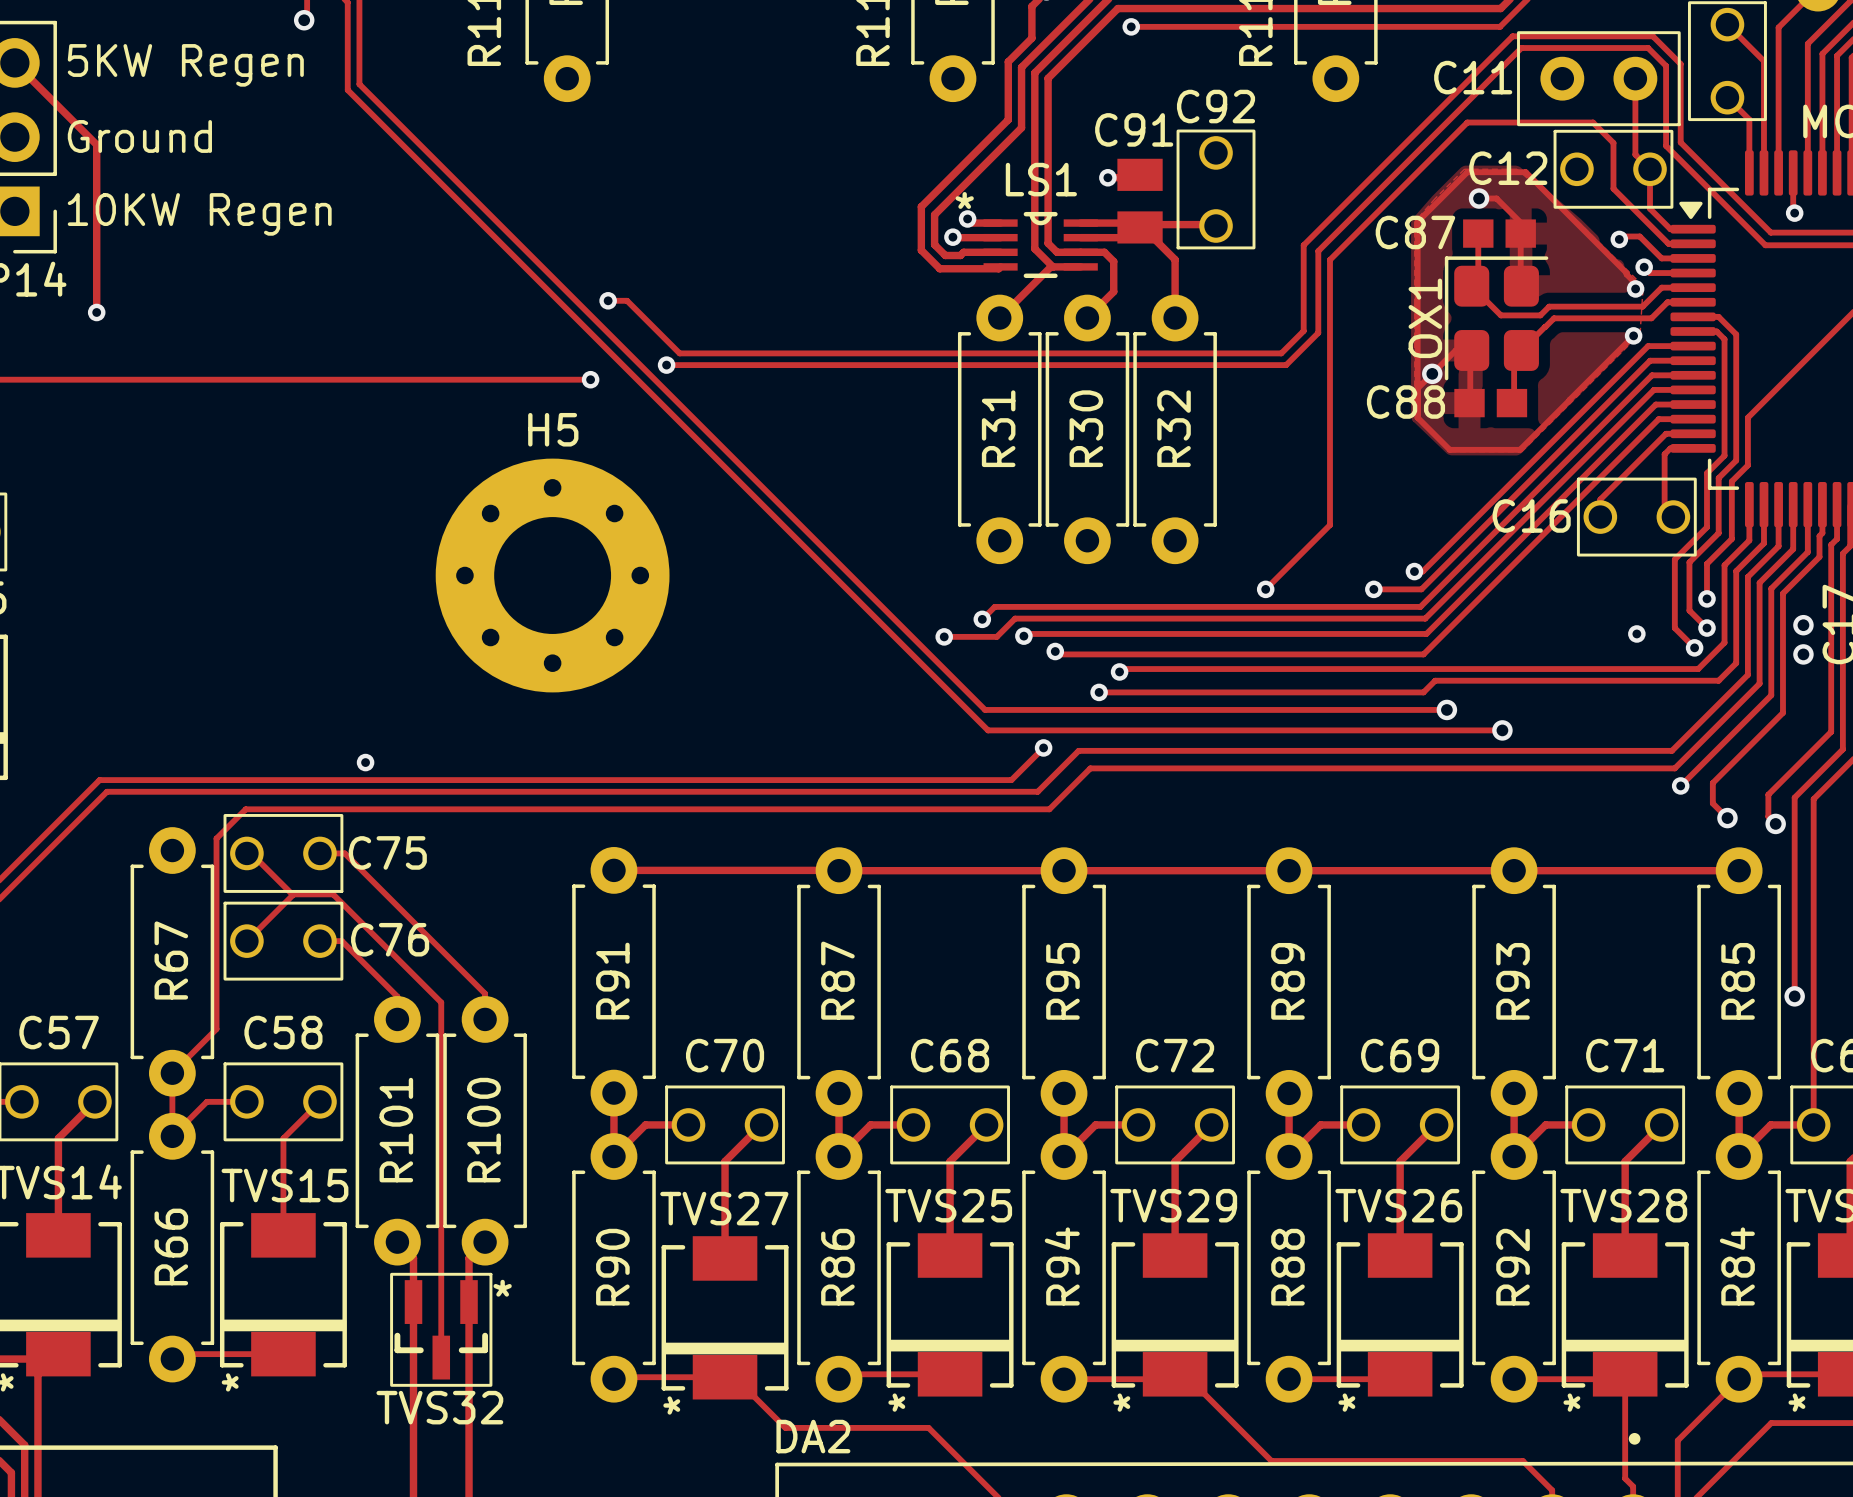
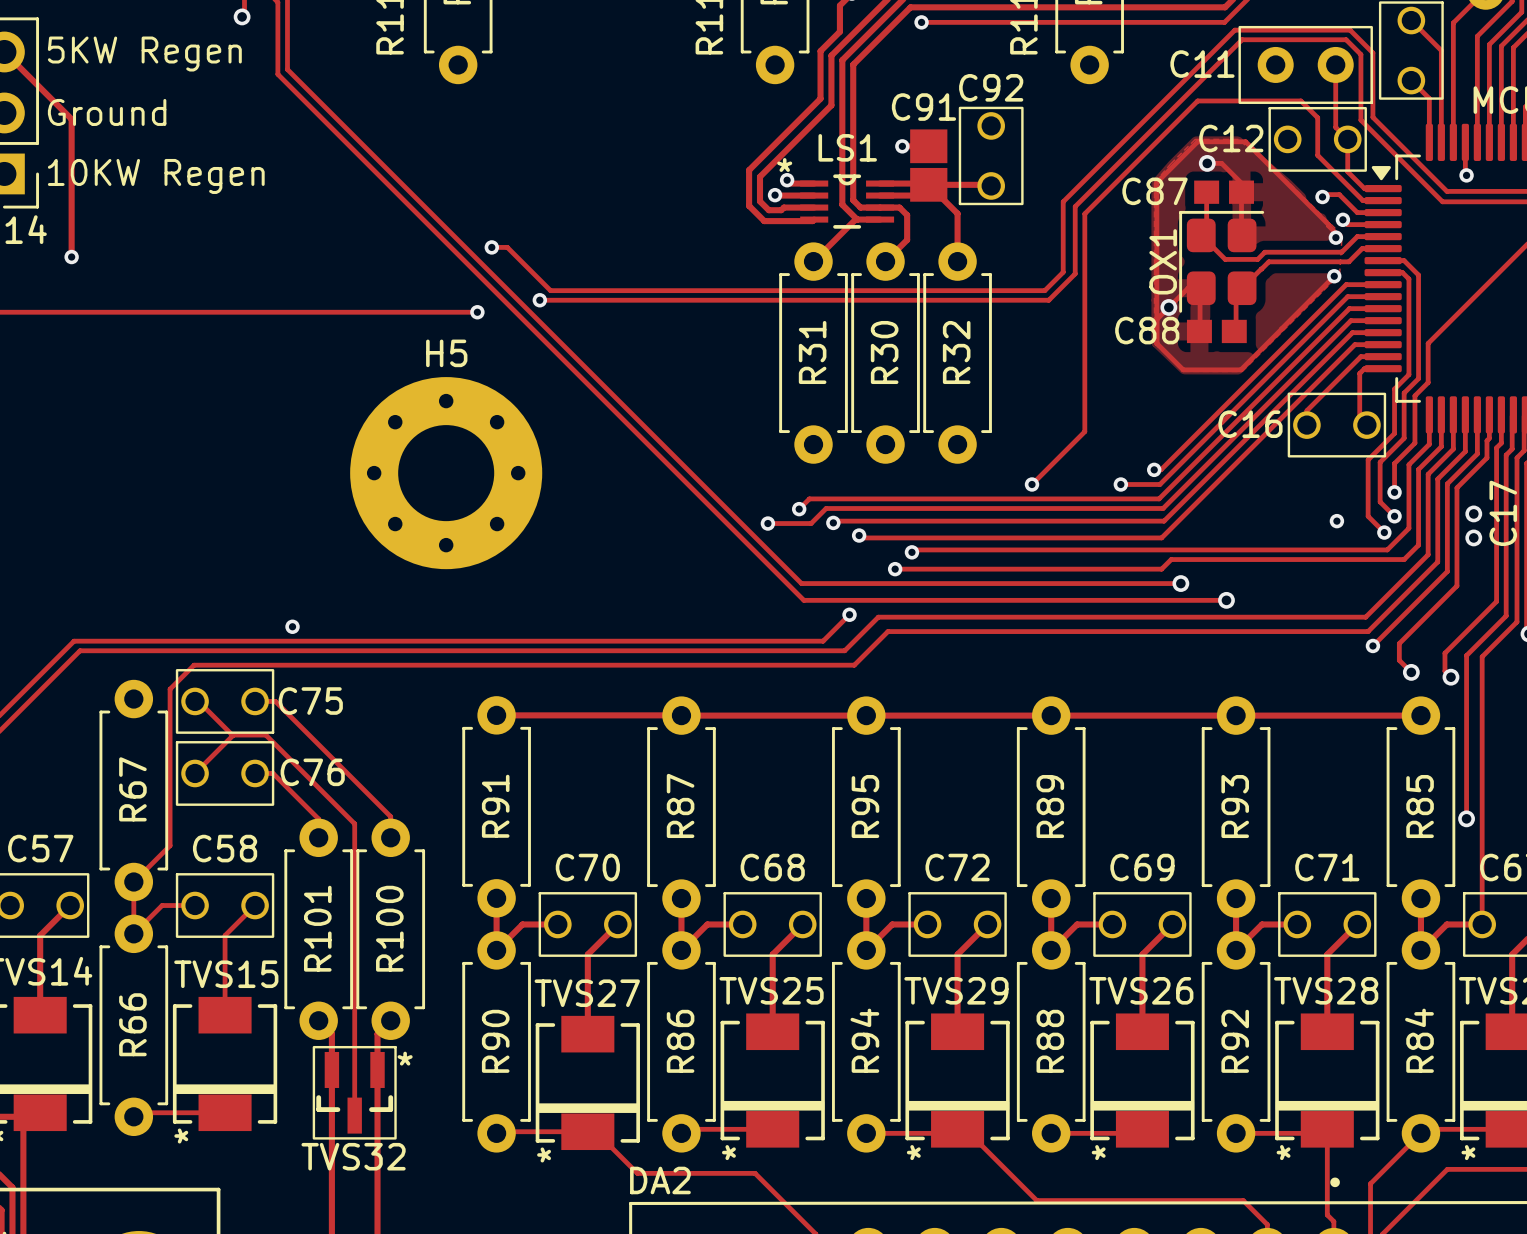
C91 footprint: [1117, 158, 1163, 244] -> [910, 129, 948, 202]

